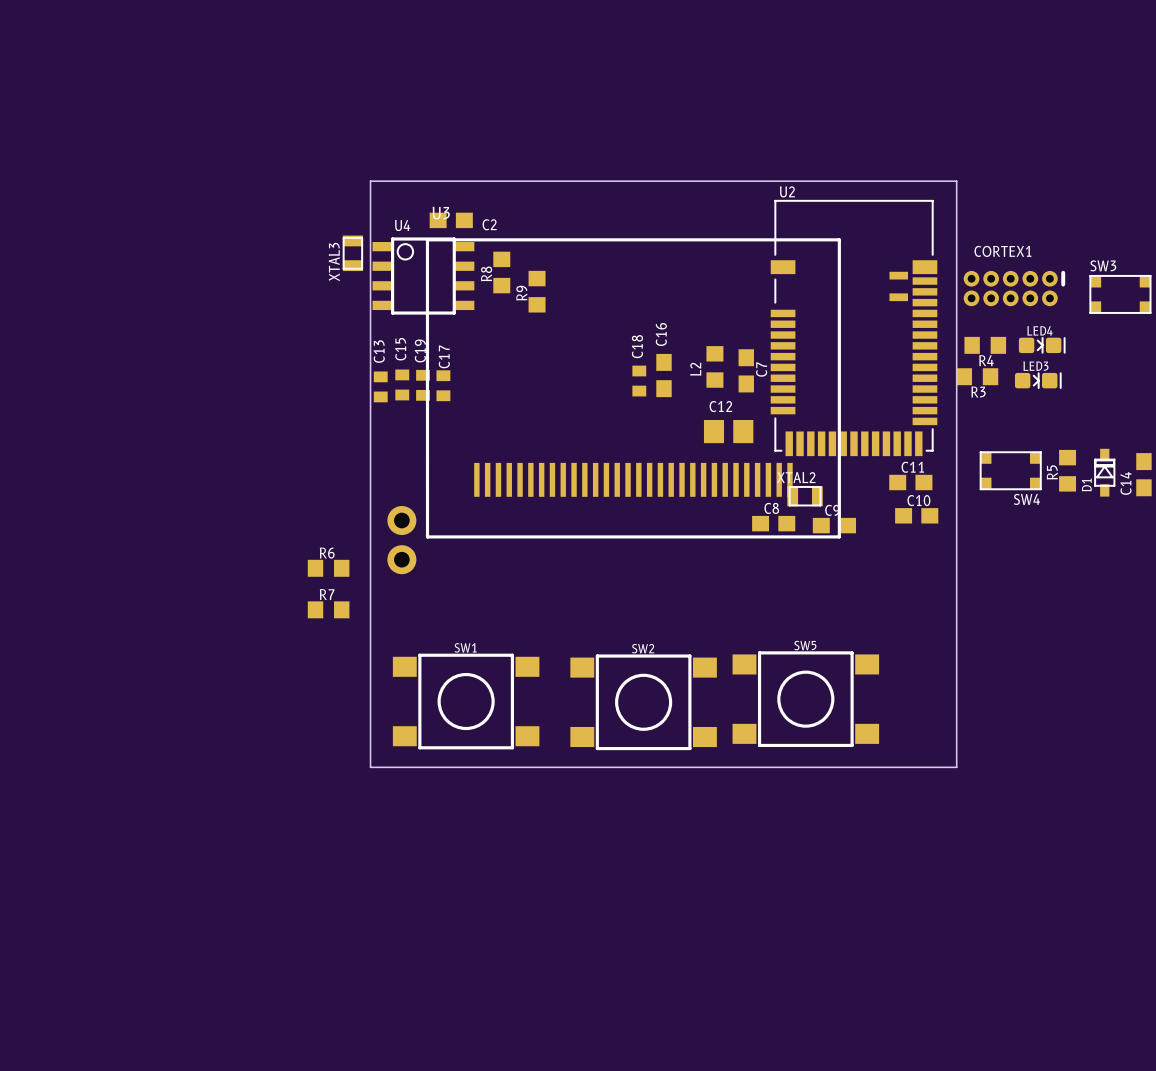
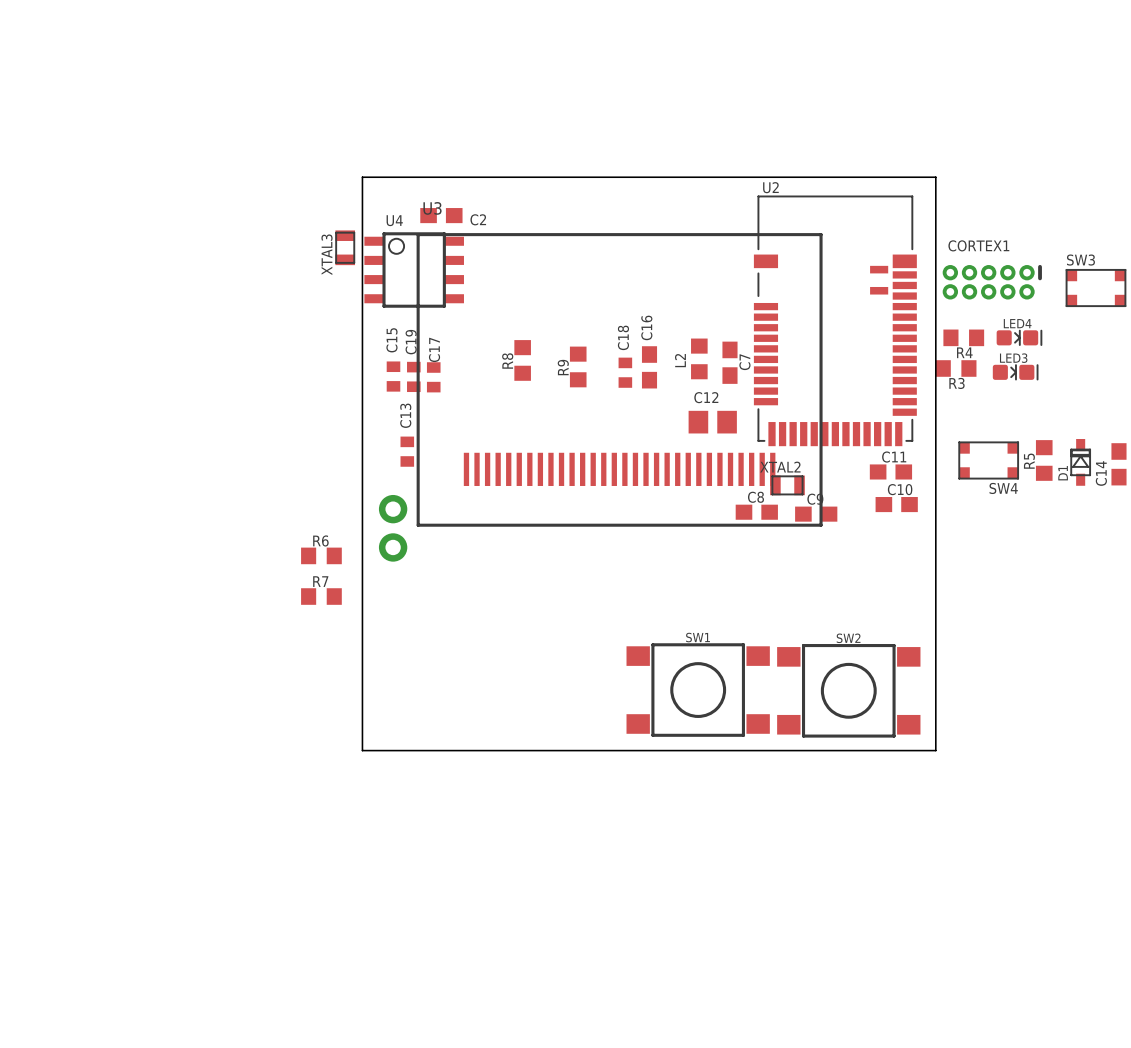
R8 position: (501, 272) -> (522, 360)
R9 position: (537, 291) -> (578, 366)
C13 position: (380, 386) -> (407, 451)
SW5: (805, 699) -> none
SW1 position: (466, 701) -> (698, 690)
SW2 position: (643, 702) -> (848, 690)

